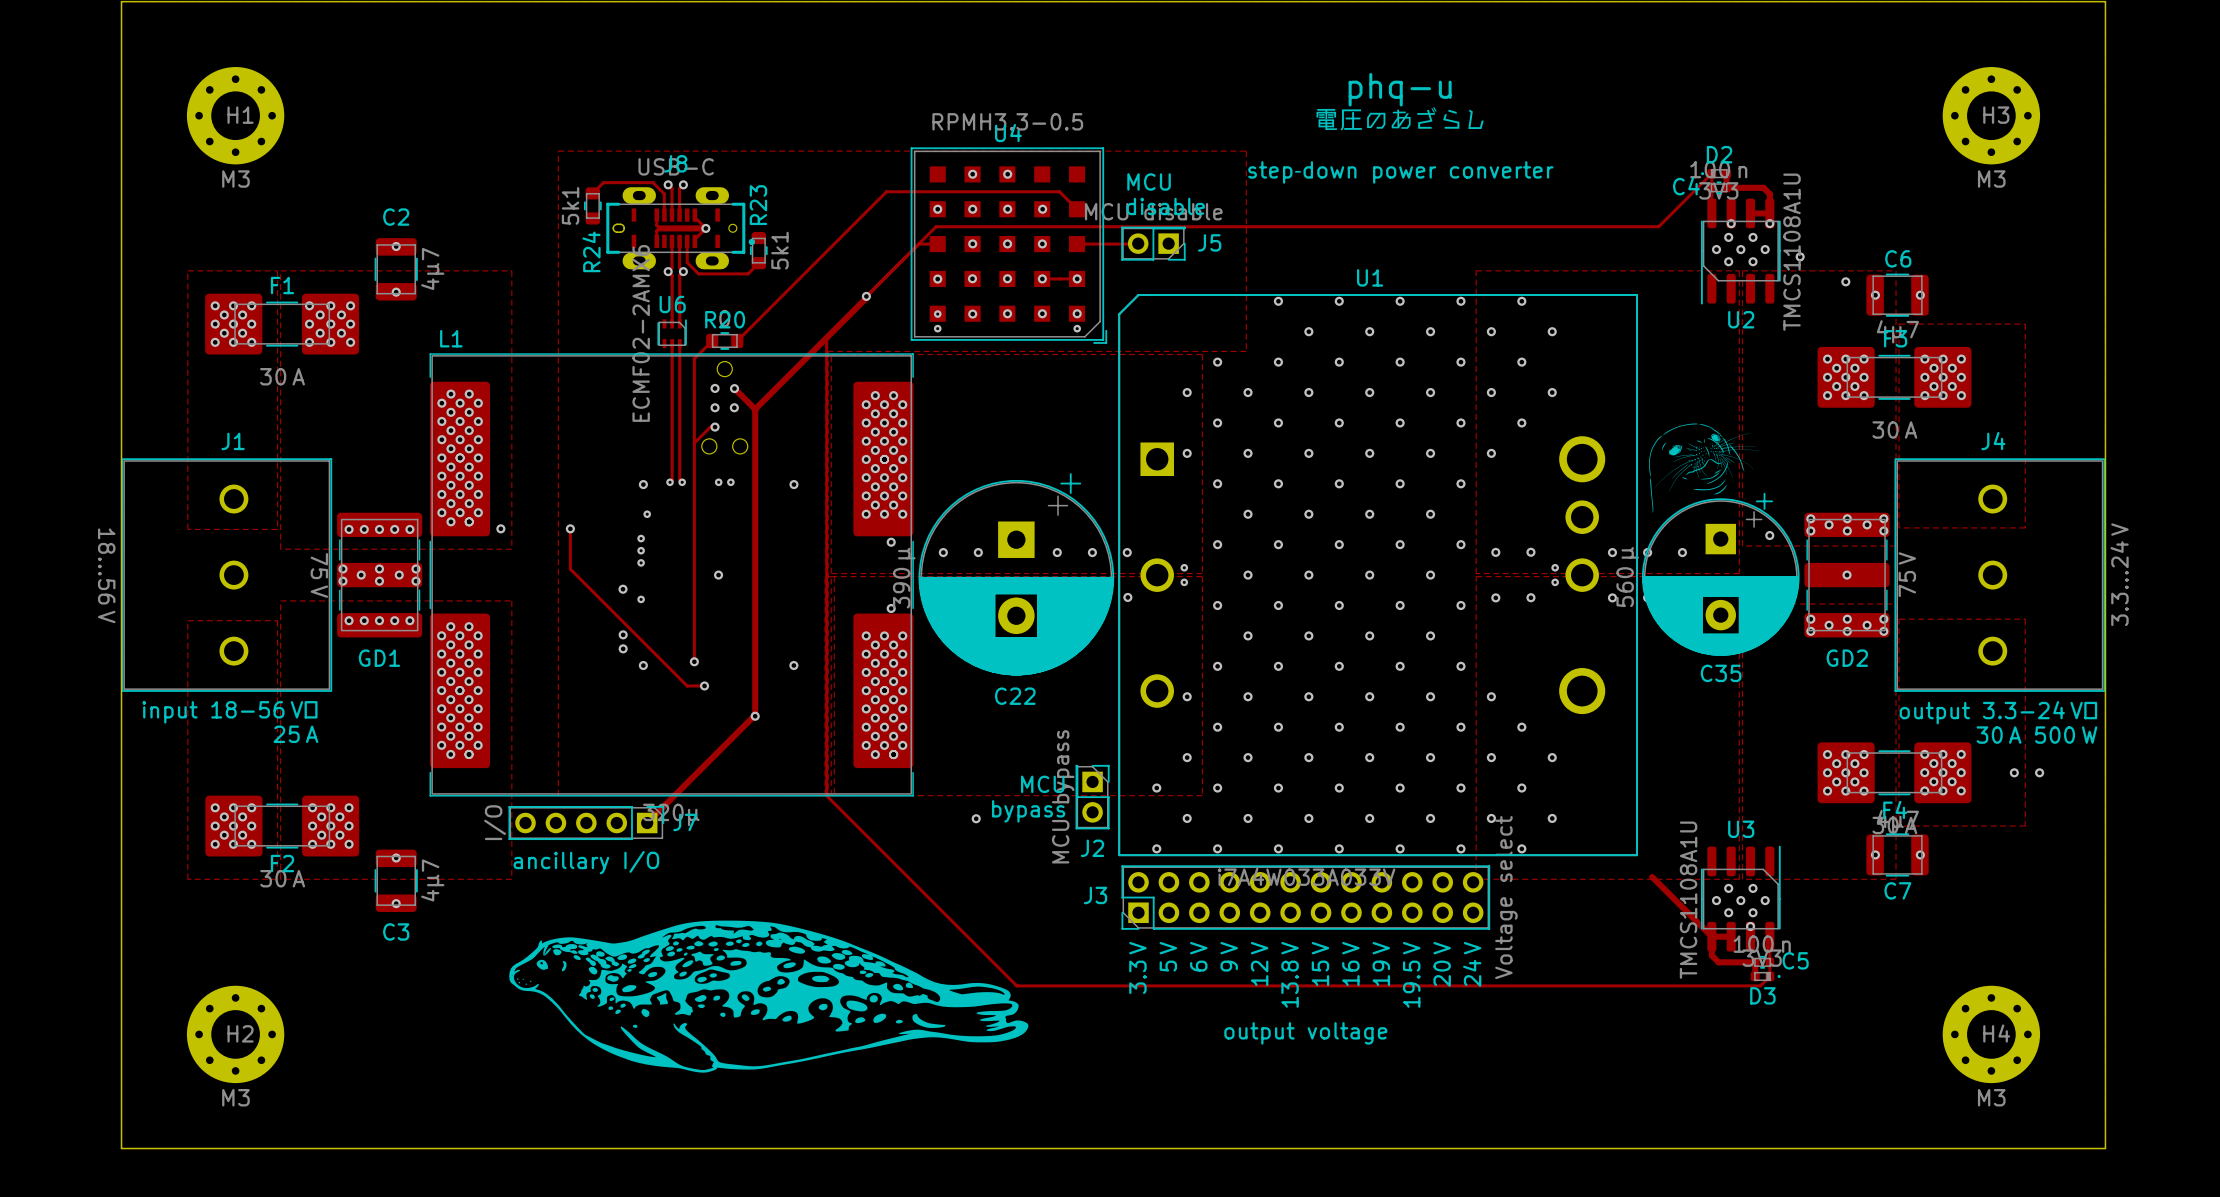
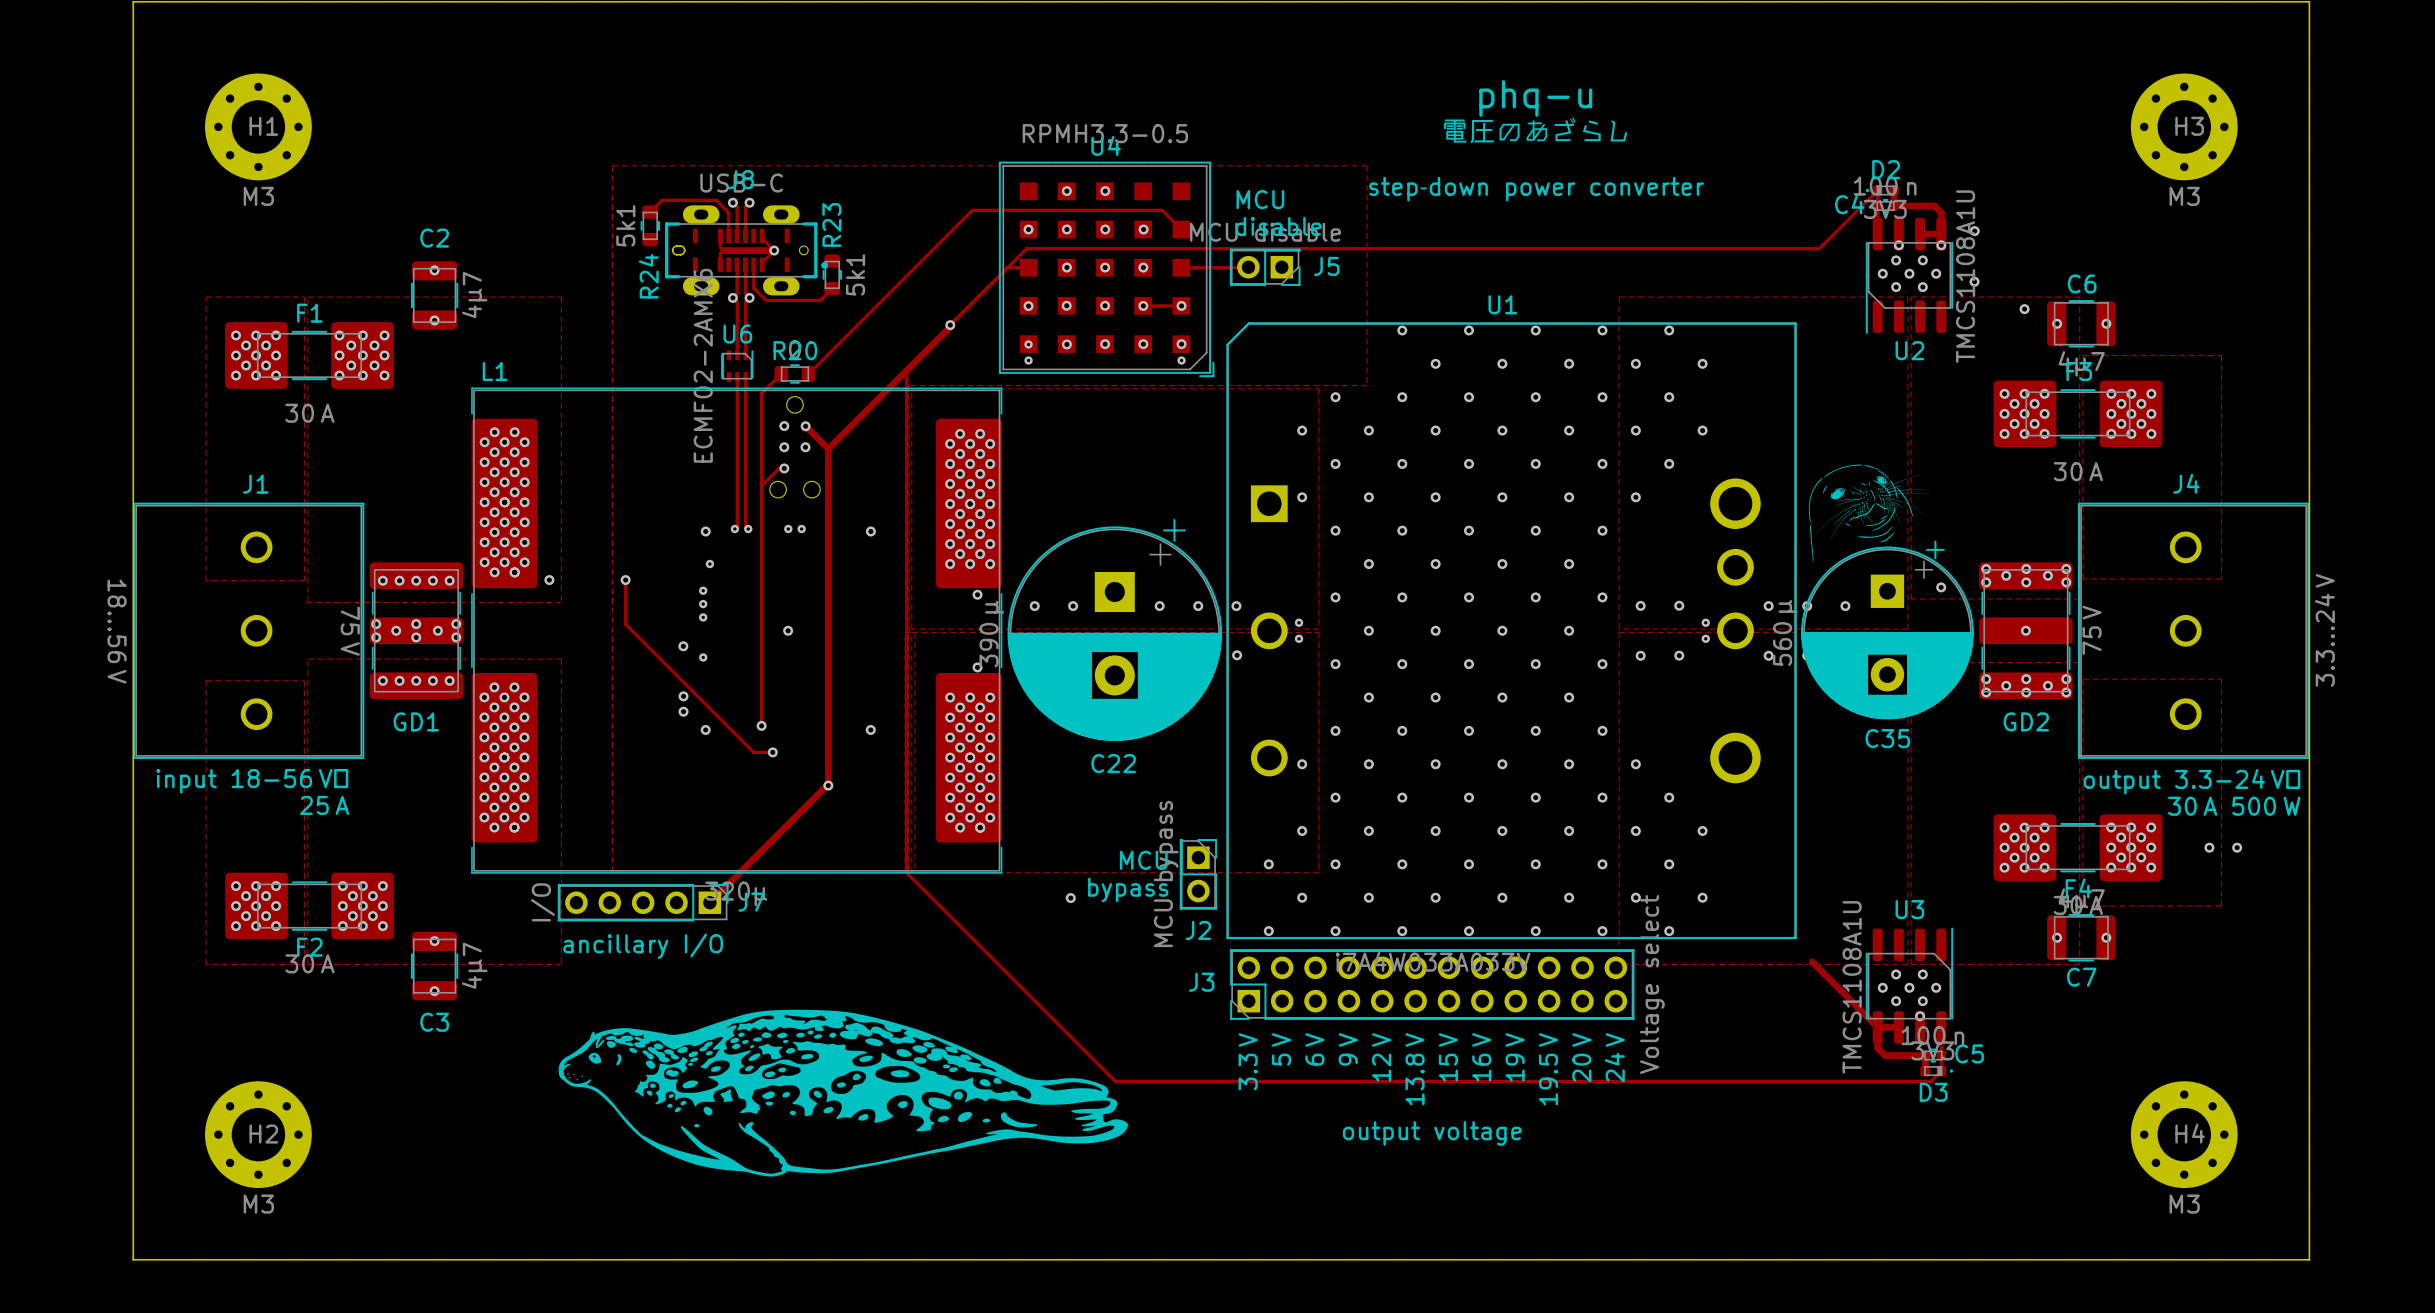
via: none -> (1974, 231)

